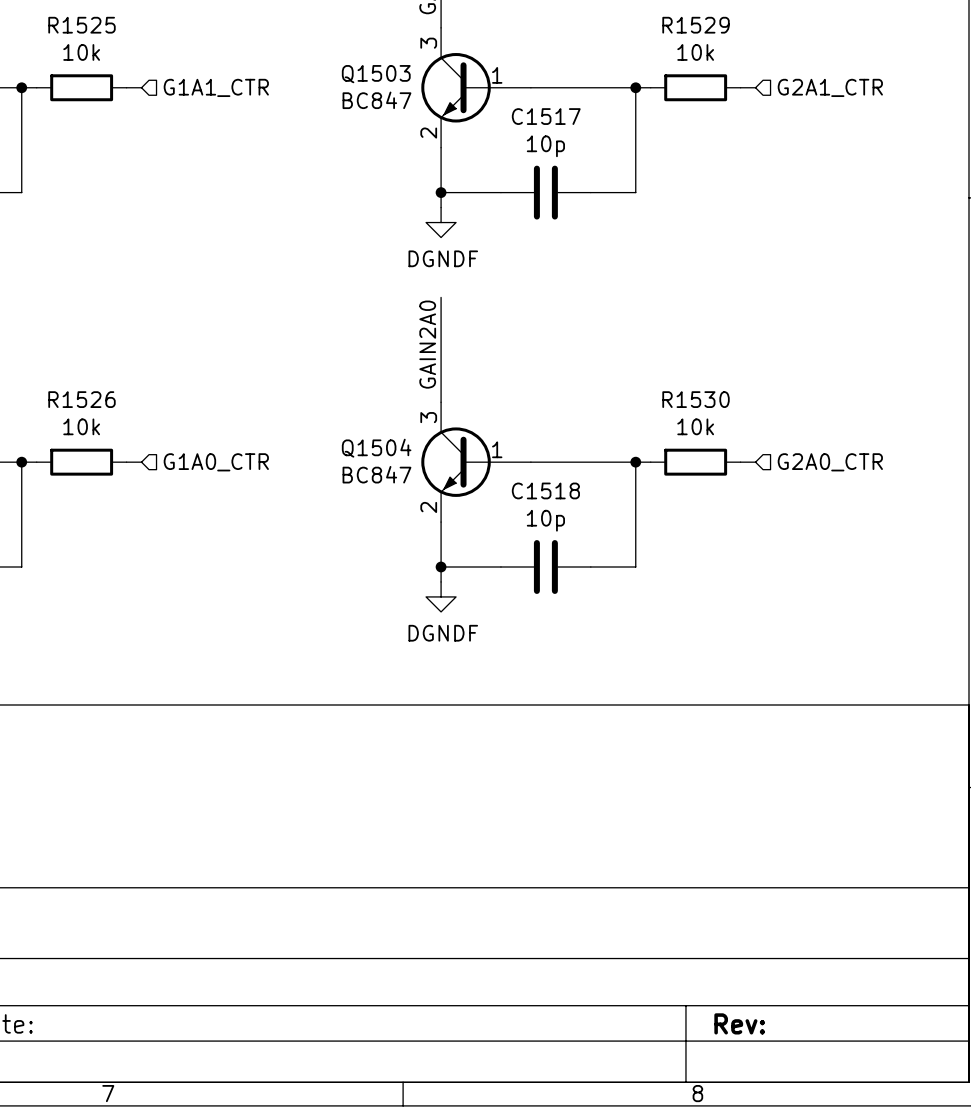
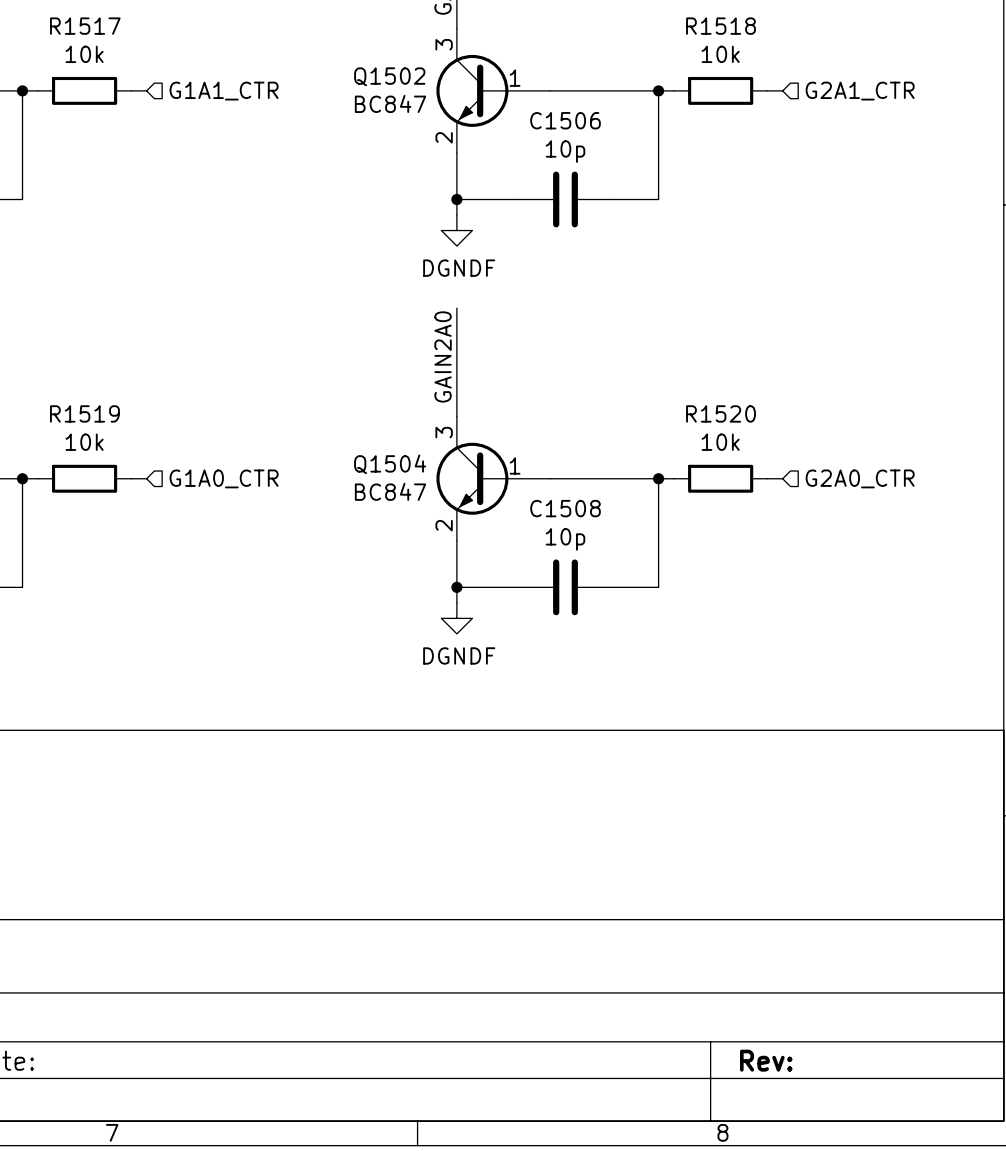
R1525 name: R1525 (82, 25) -> R1517 (85, 26)
R1529 name: R1529 (696, 25) -> R1518 (721, 26)
Q1503 name: Q1503 (376, 74) -> Q1502 (389, 76)
C1517 name: C1517 (546, 116) -> C1506 (565, 120)
R1526 name: R1526 (82, 399) -> R1519 (84, 413)
R1530 name: R1530 (696, 399) -> R1520 (721, 413)
C1518 name: C1518 (545, 490) -> C1508 (565, 508)

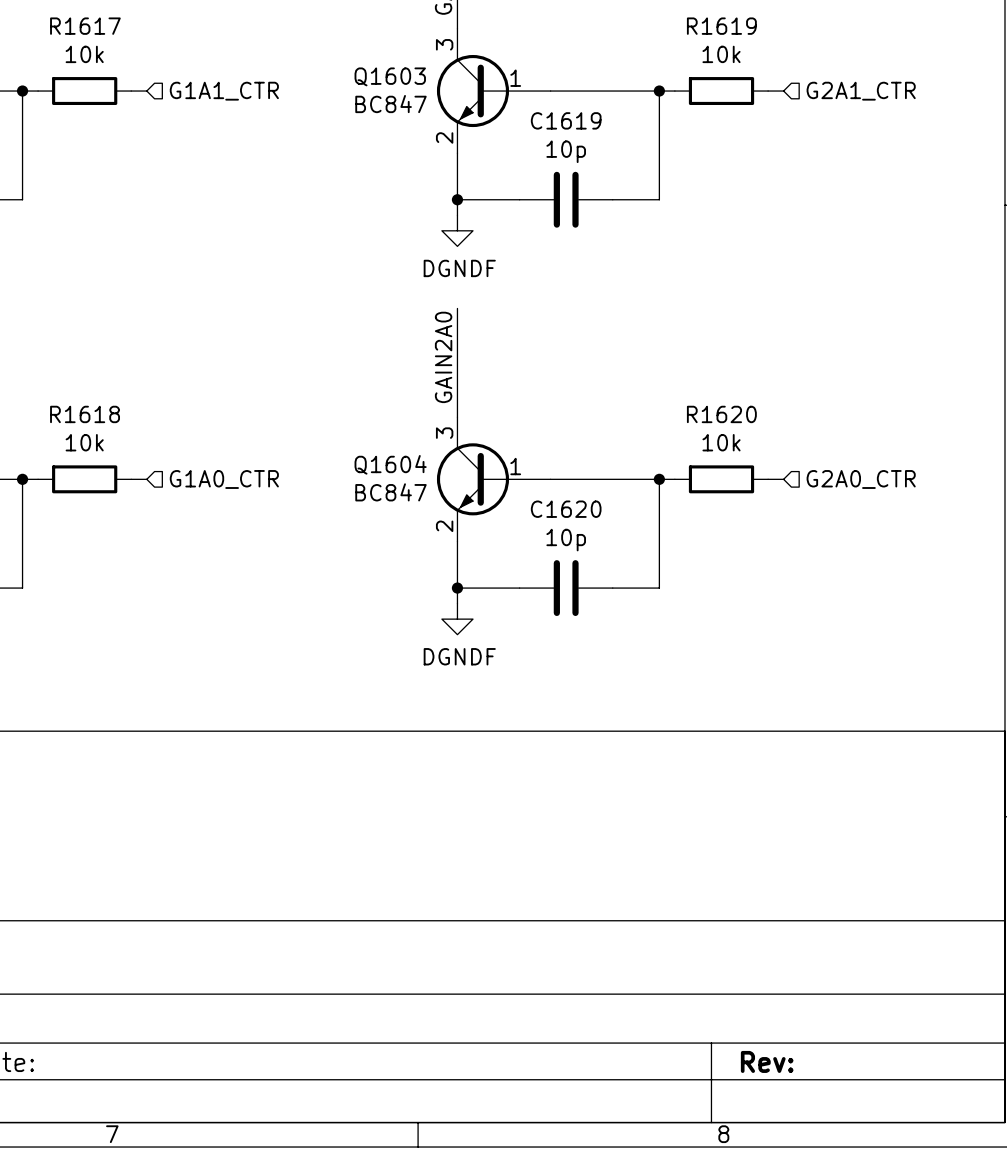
R1517 name: R1517 (85, 26) -> R1617 (85, 26)
R1518 name: R1518 (721, 26) -> R1619 (721, 26)
Q1502 name: Q1502 (389, 76) -> Q1603 (390, 76)
C1506 name: C1506 (565, 120) -> C1619 (566, 120)
R1519 name: R1519 (84, 413) -> R1618 (85, 414)
R1520 name: R1520 (721, 413) -> R1620 (721, 414)
Q1504 name: Q1504 (390, 464) -> Q1604 (390, 464)
C1508 name: C1508 (565, 508) -> C1620 (566, 509)

